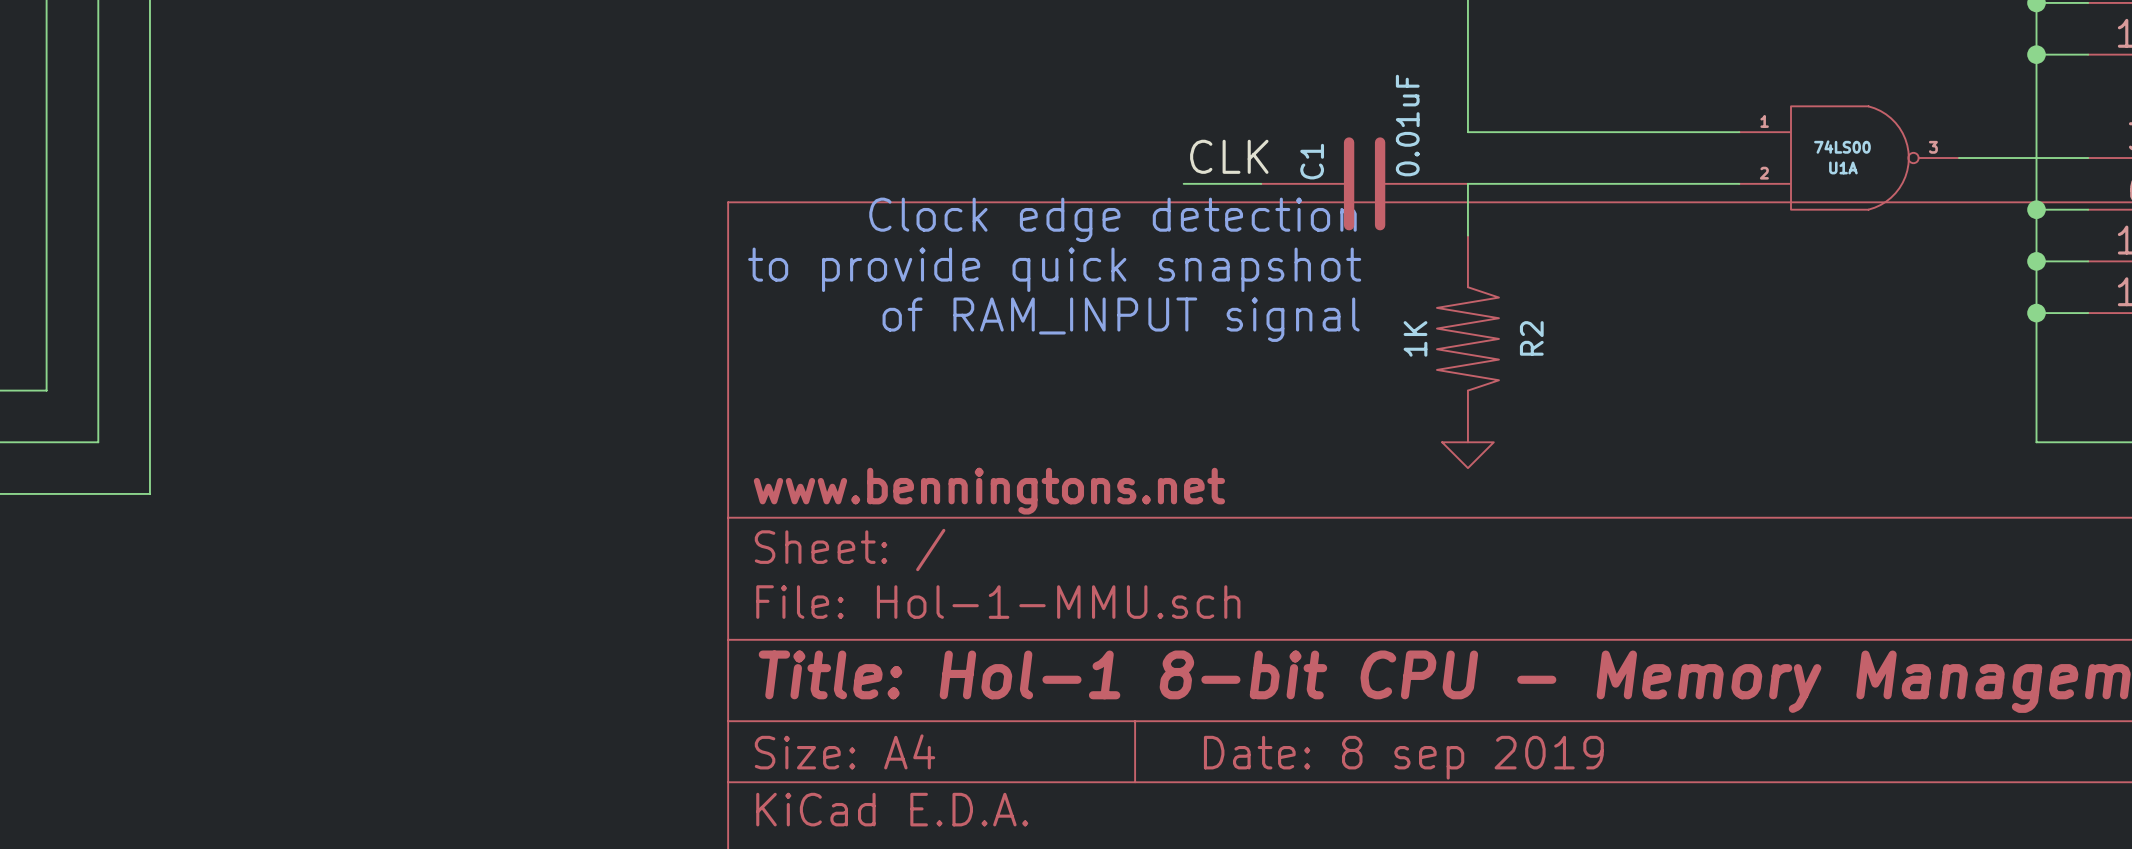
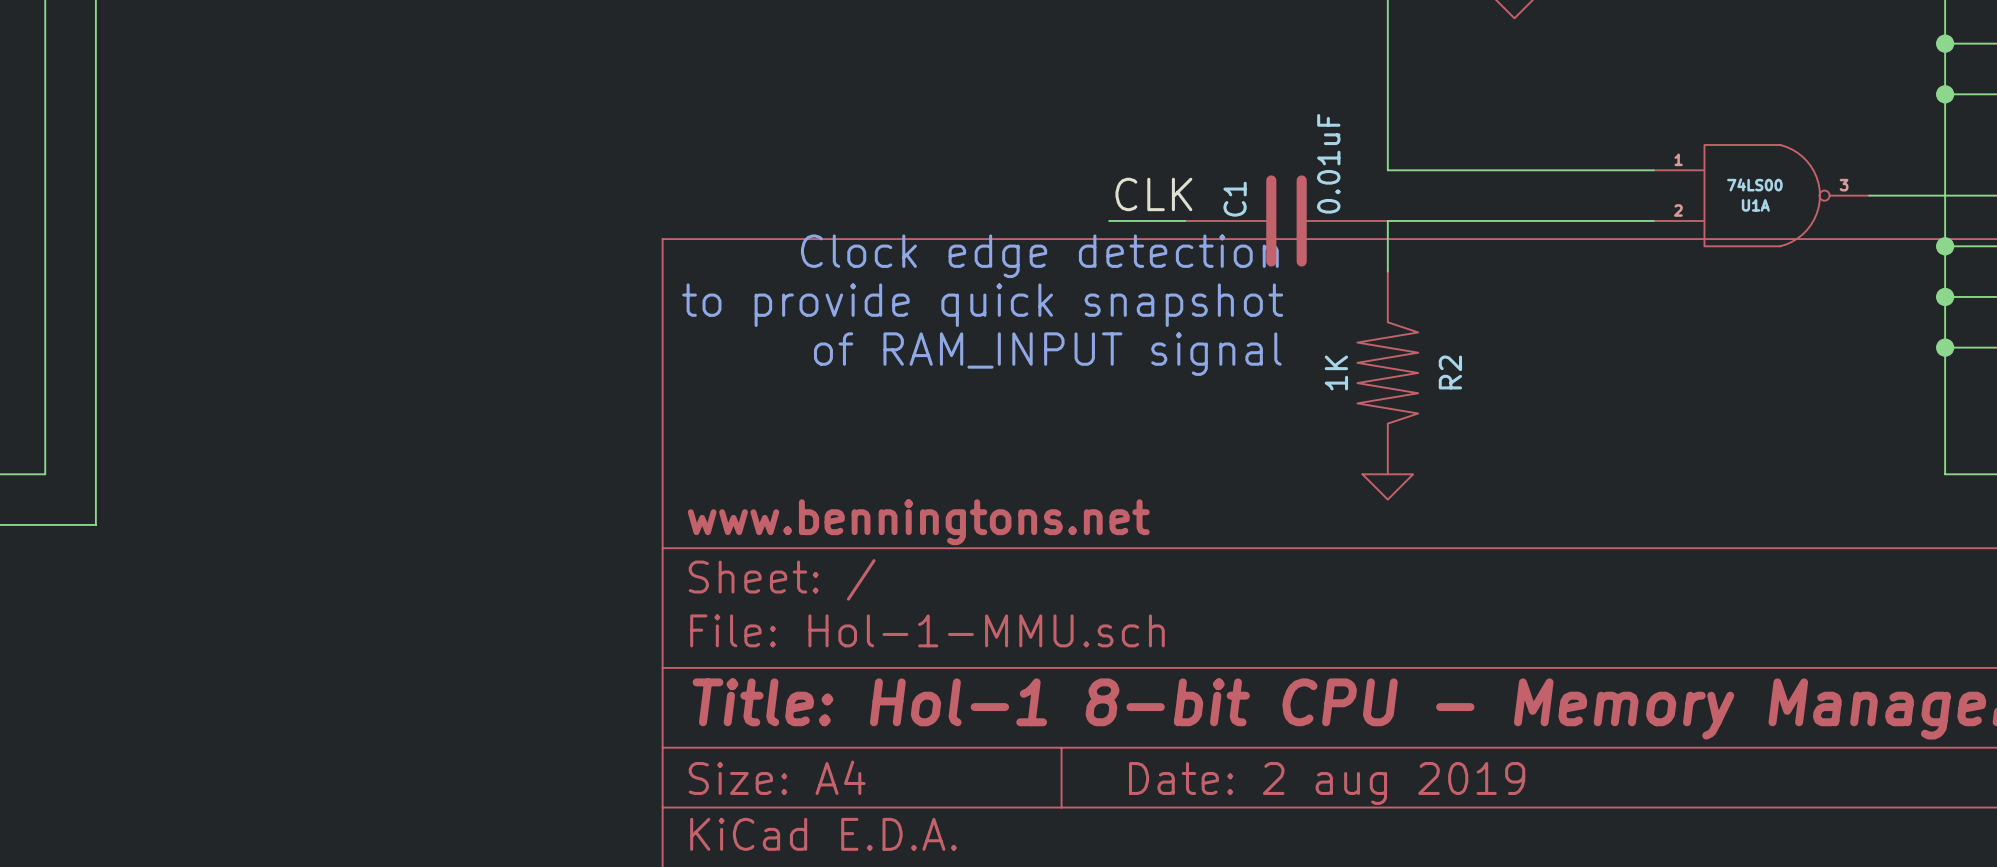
title block: Date: 8 sep 2019 (1403, 757) -> Date: 2 aug 2019 (1327, 783)

